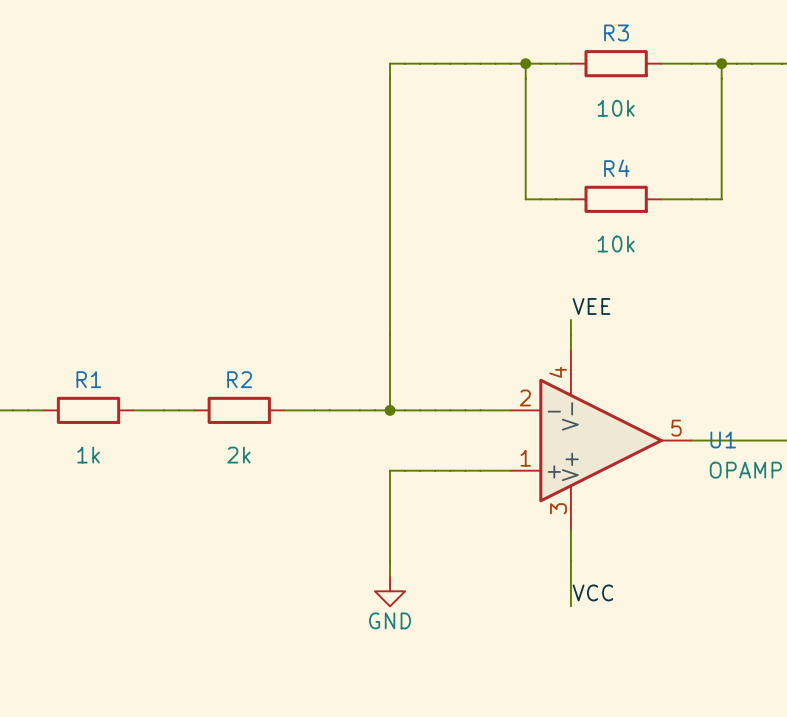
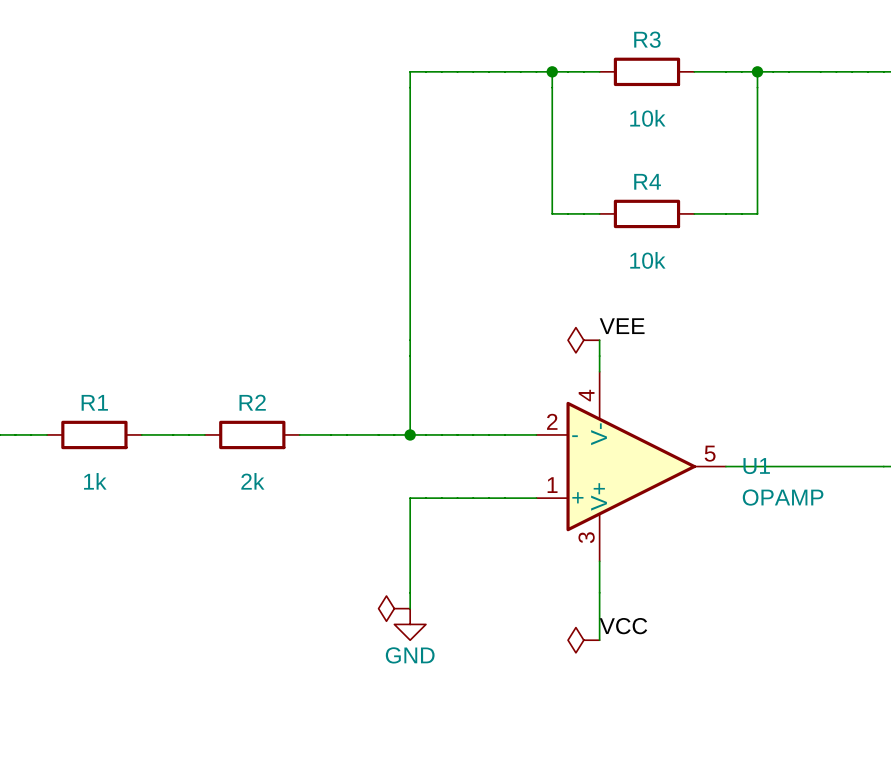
power symbol: none -> (583, 340)
power symbol: none -> (394, 608)
power symbol: none -> (583, 640)

